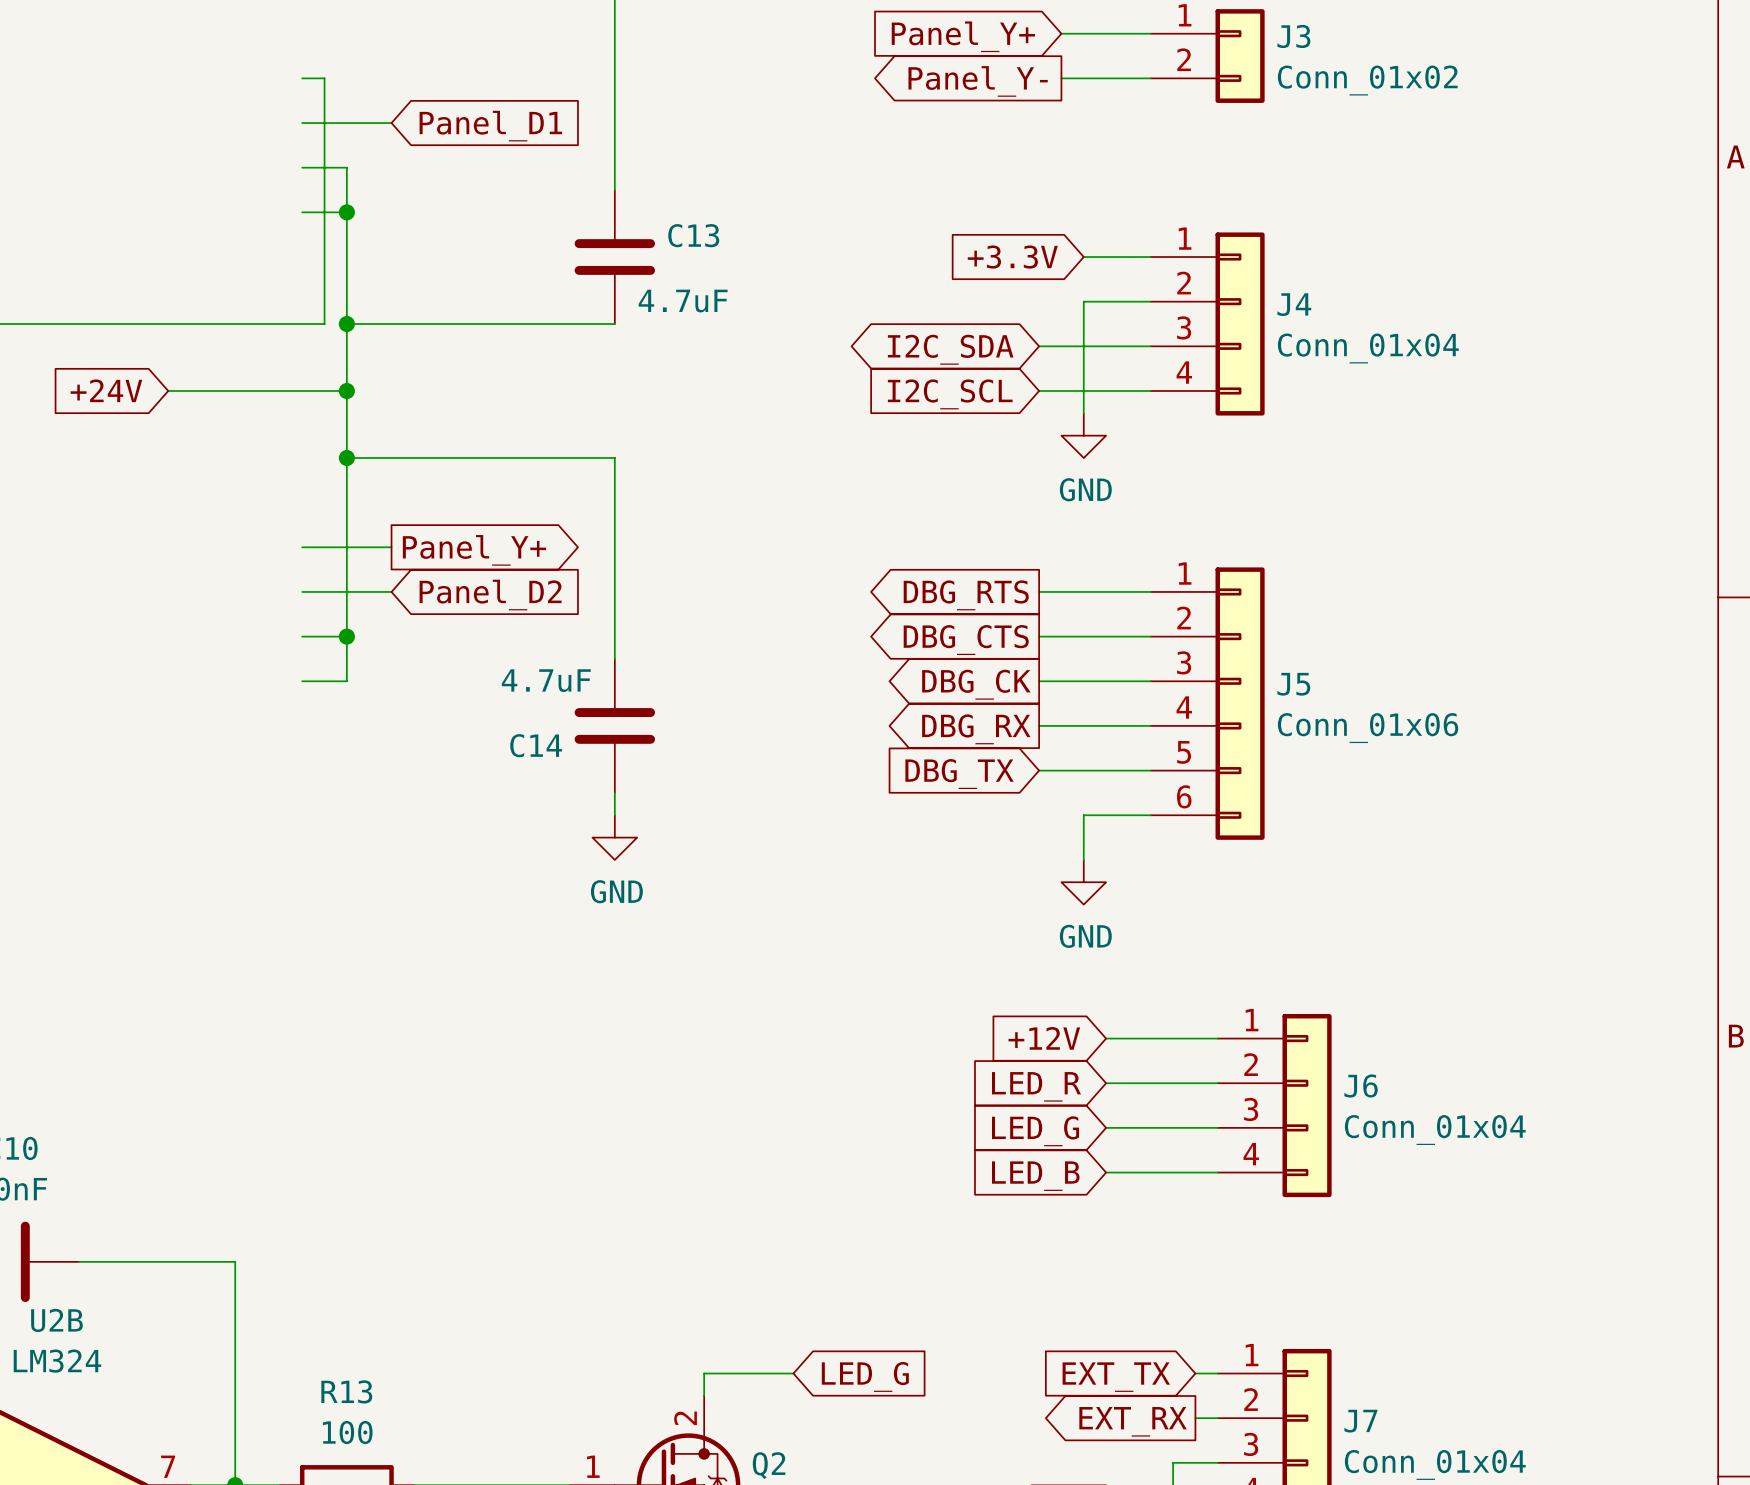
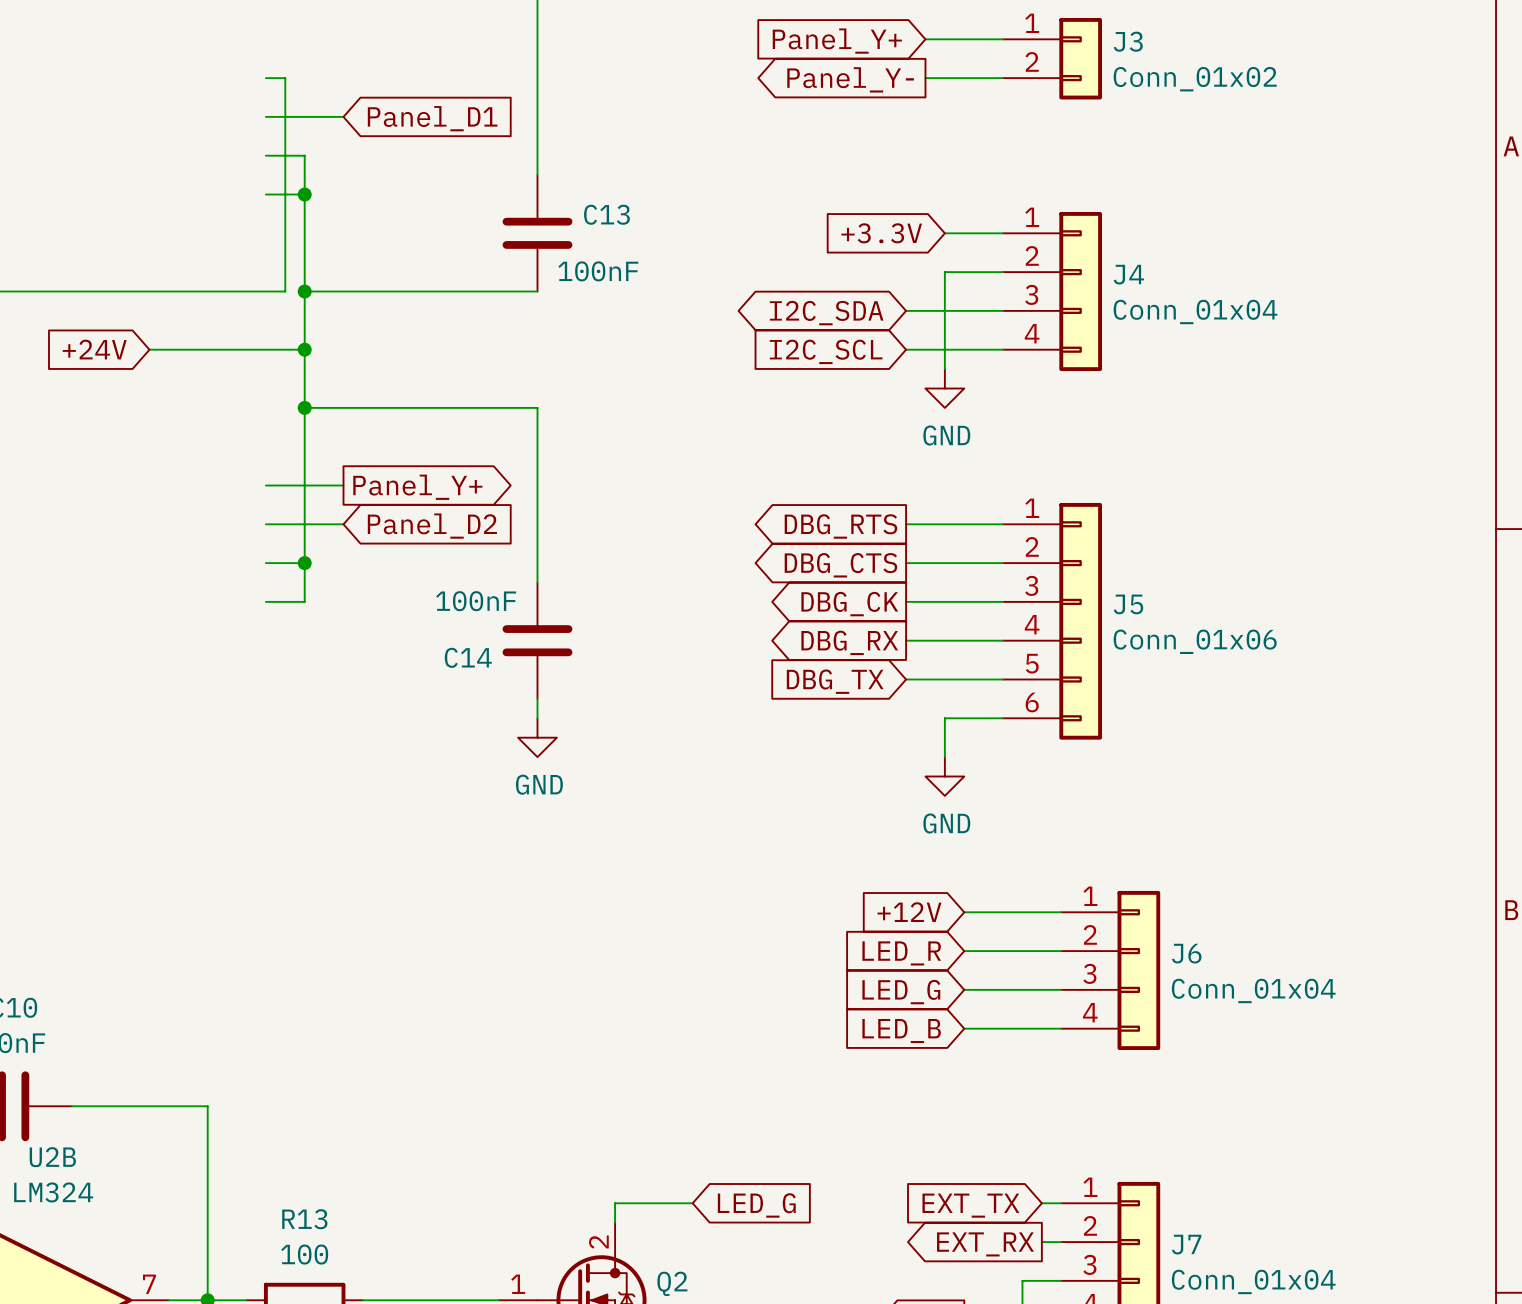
C13 value: 4.7uF (683, 301) -> 100nF (598, 271)
C14 value: 4.7uF (546, 680) -> 100nF (476, 601)

